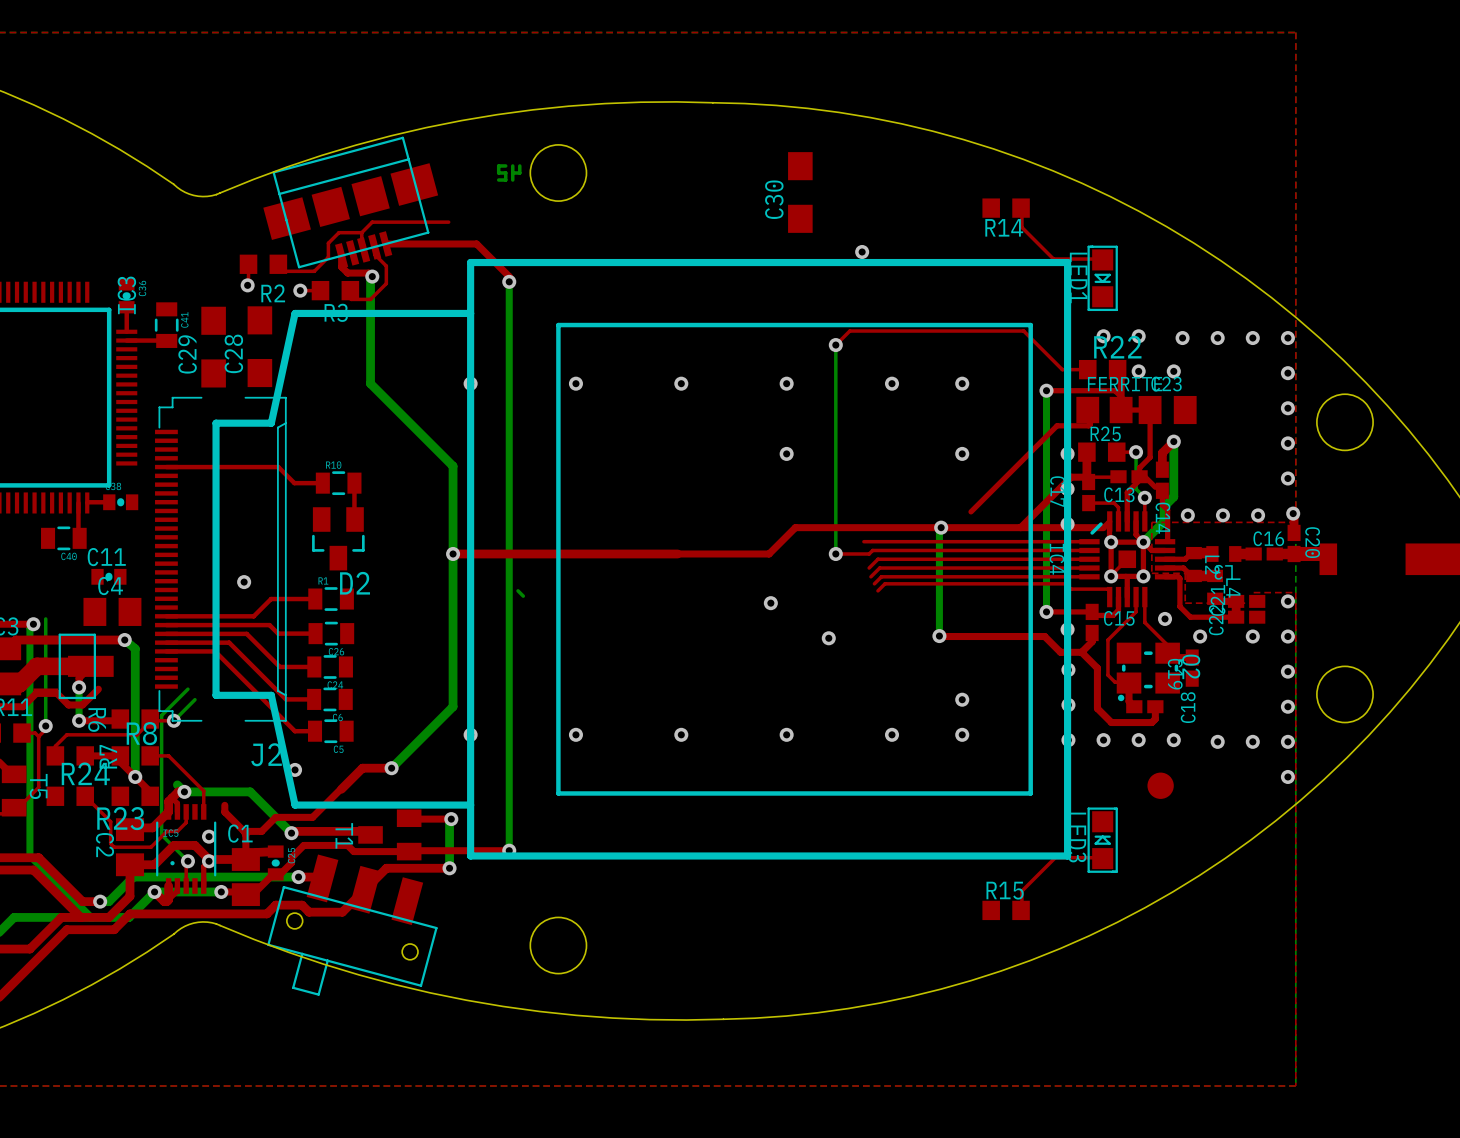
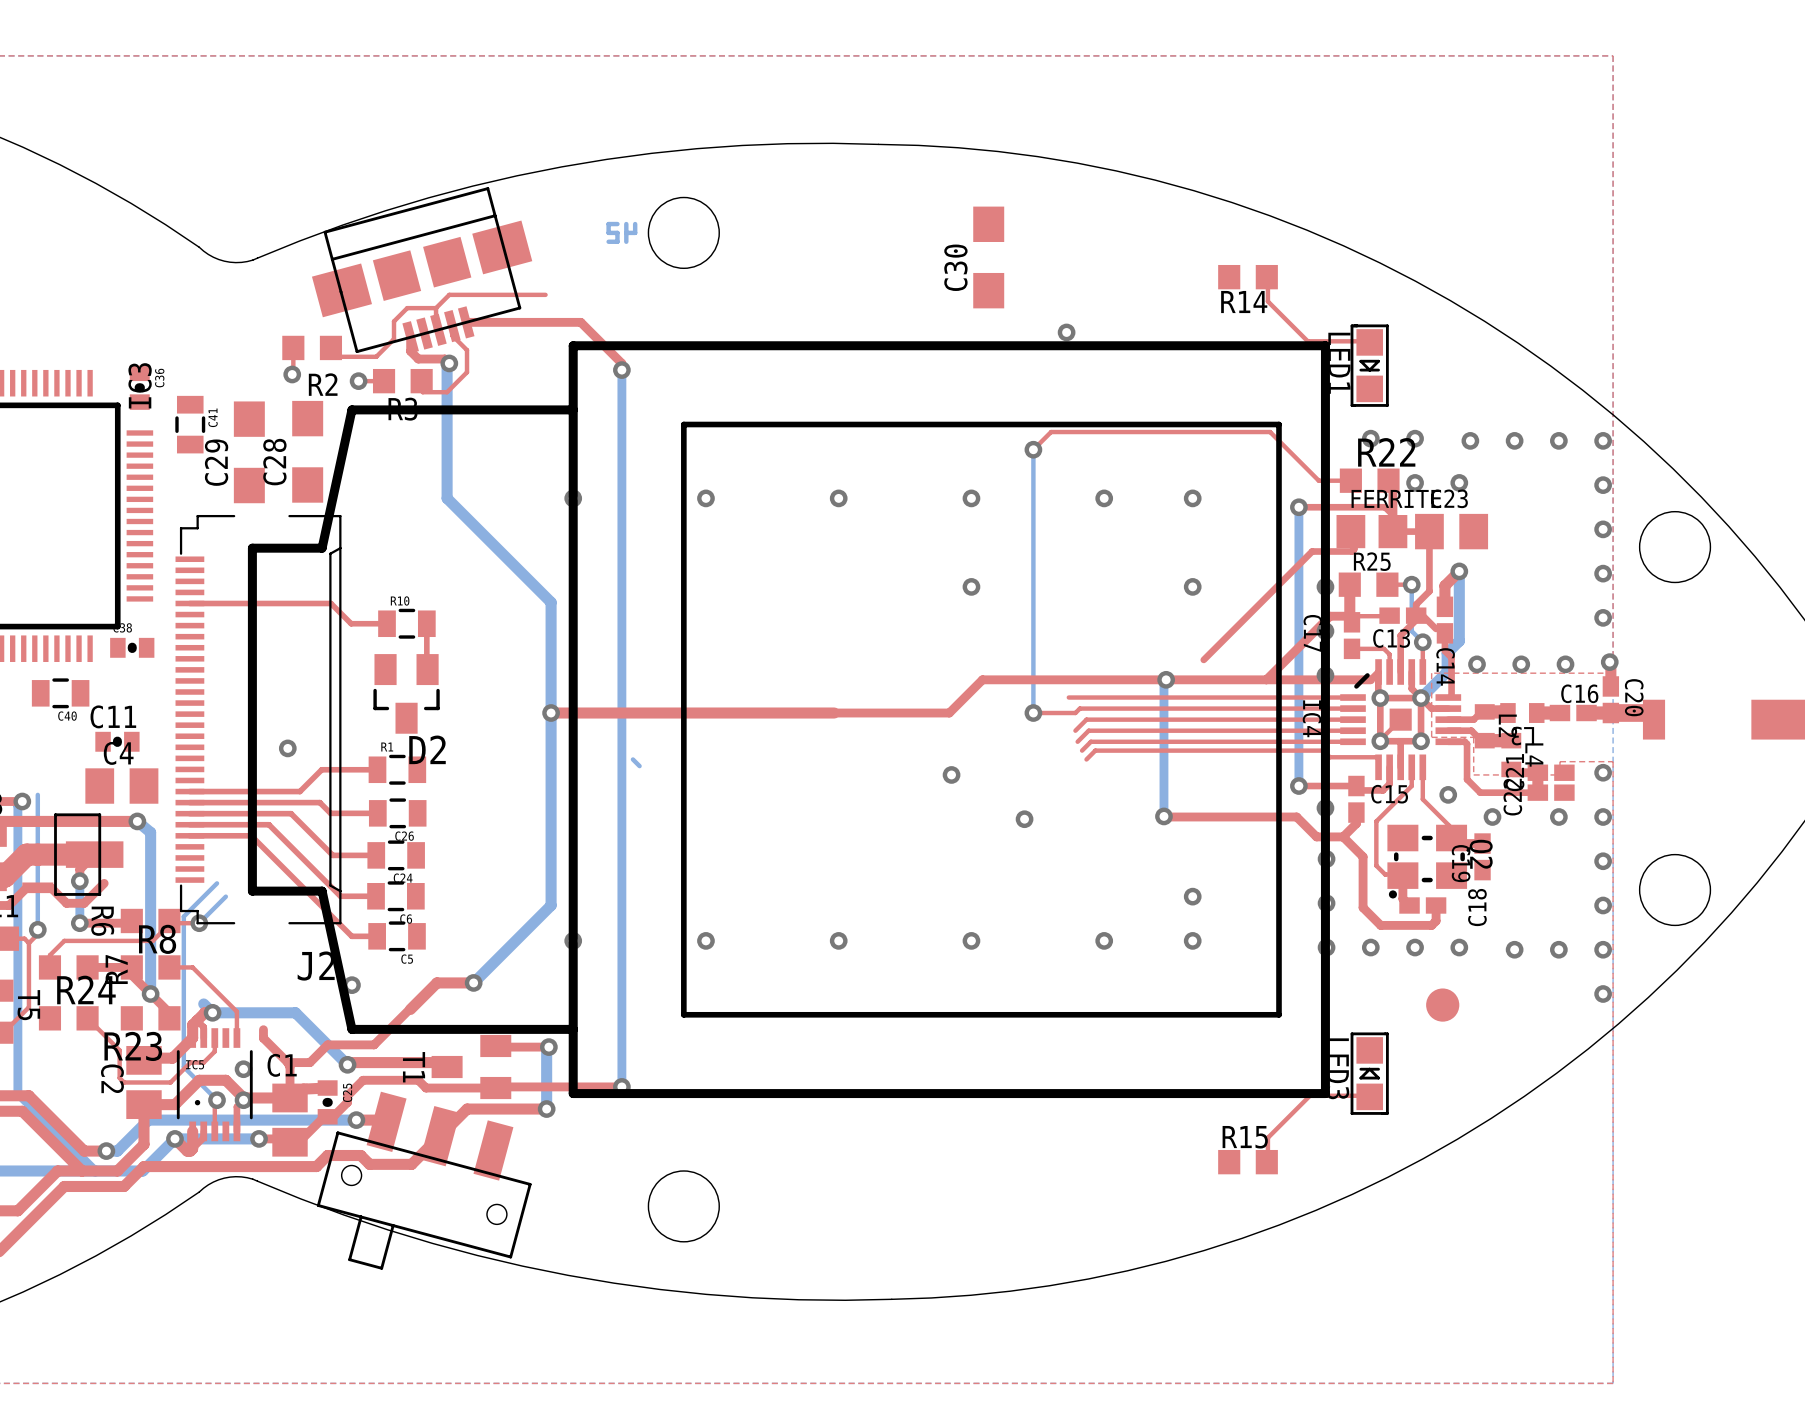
top track: (126, 307) (126, 331) -> none
top track: (126, 340) (166, 340) -> none
top track: (78, 502) (79, 538) -> none
top track: (109, 502) (87, 502) -> none

